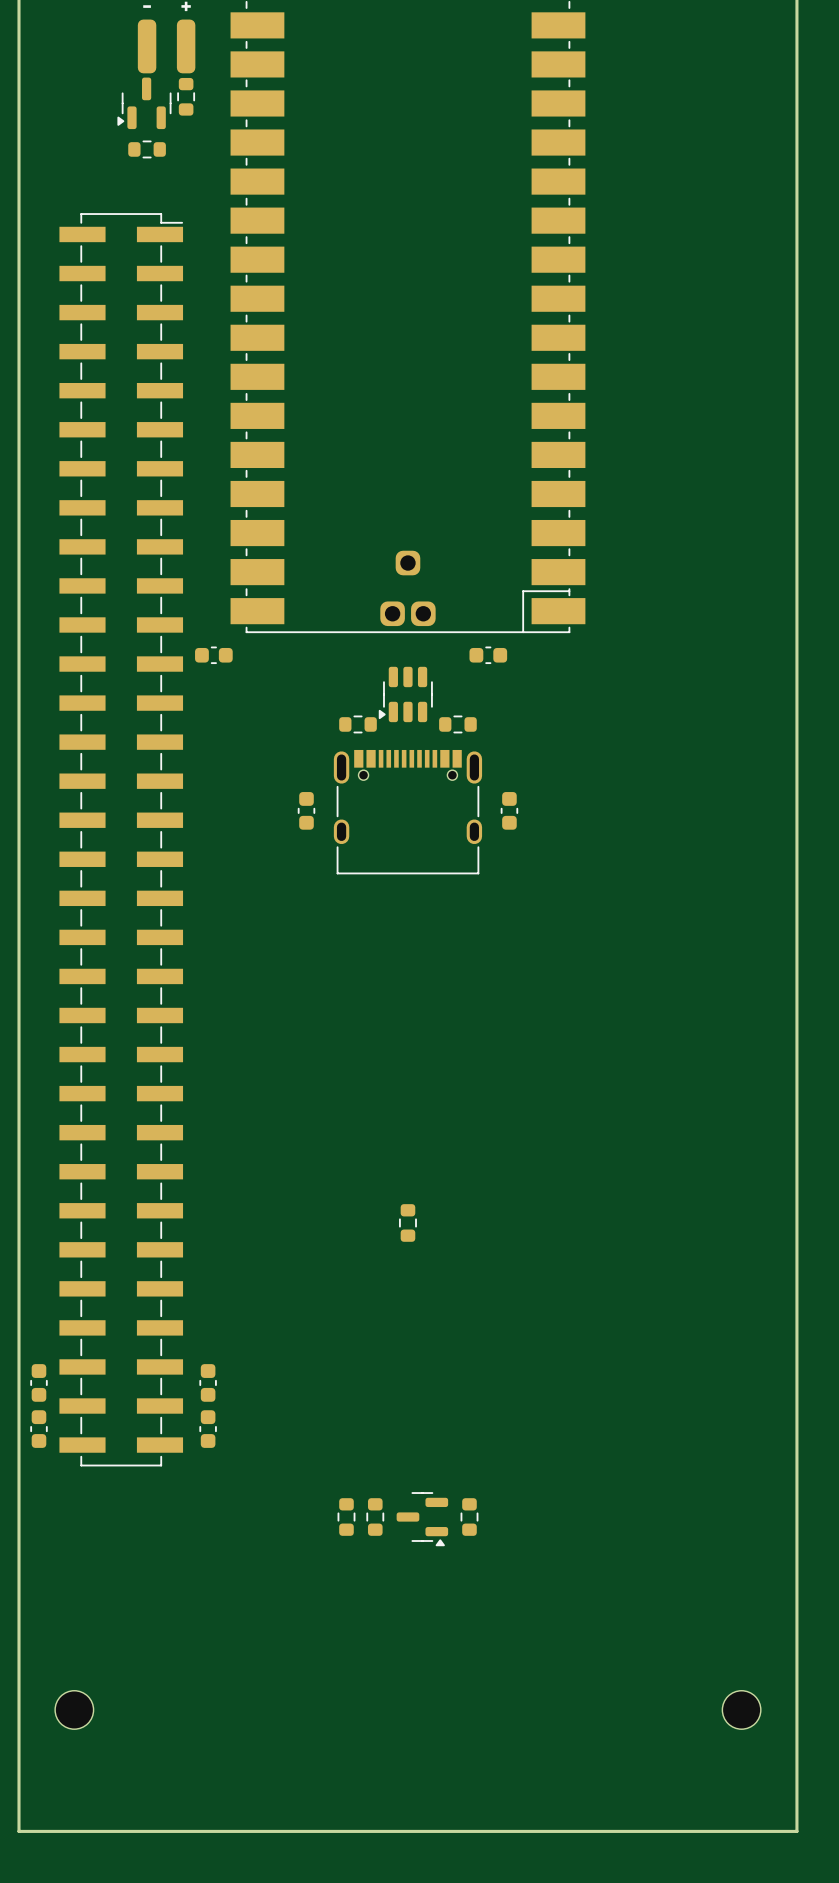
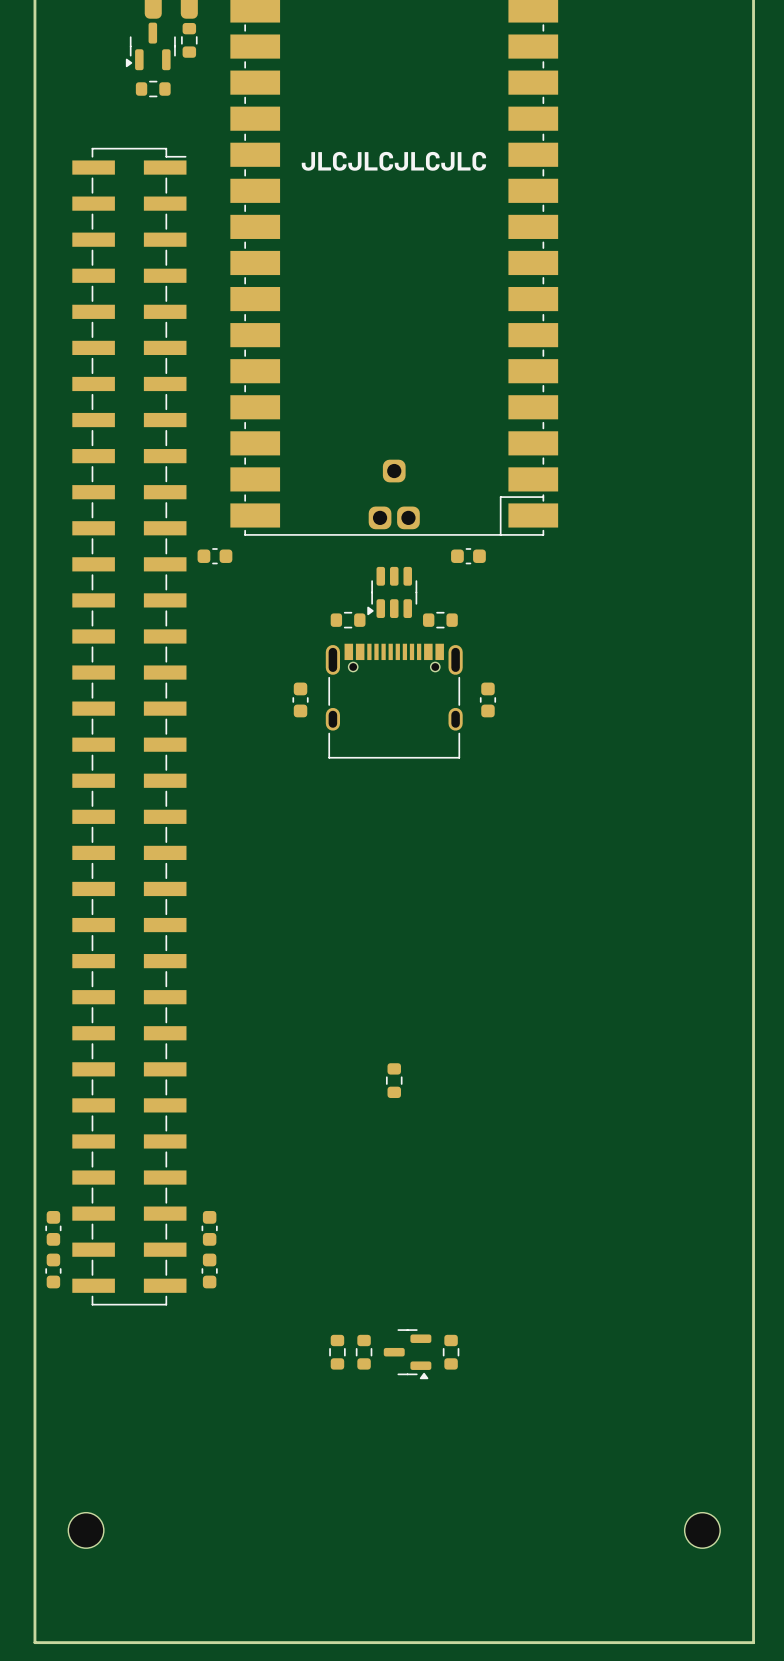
text: none -> JLCJLCJLCJLC (393, 161)

